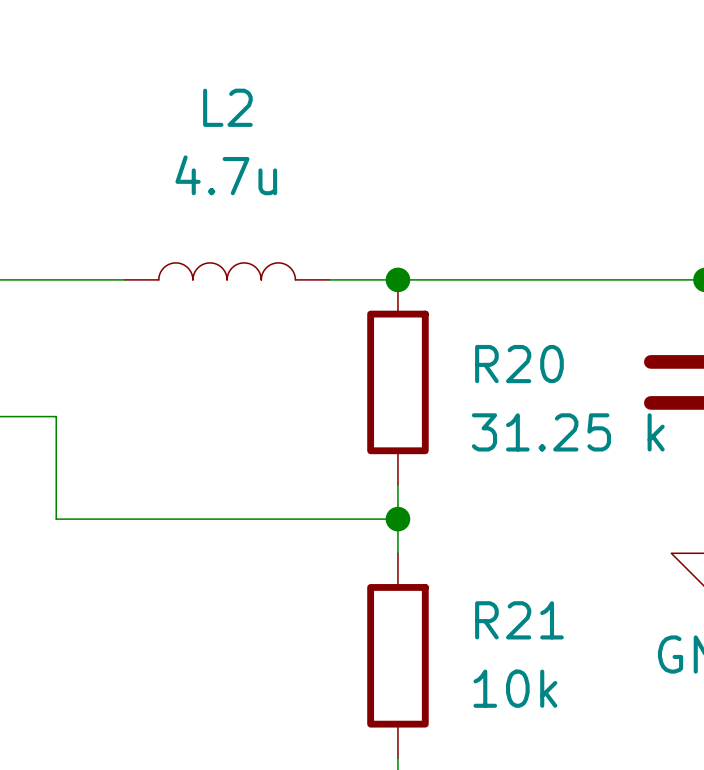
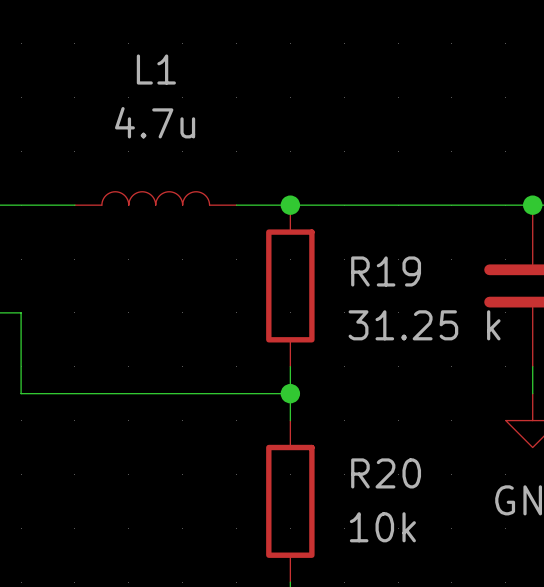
L2 name: L2 (227, 107) -> L1 (156, 69)
R20 name: R20 (519, 364) -> R19 (386, 271)
R21 name: R21 (519, 620) -> R20 (386, 473)

